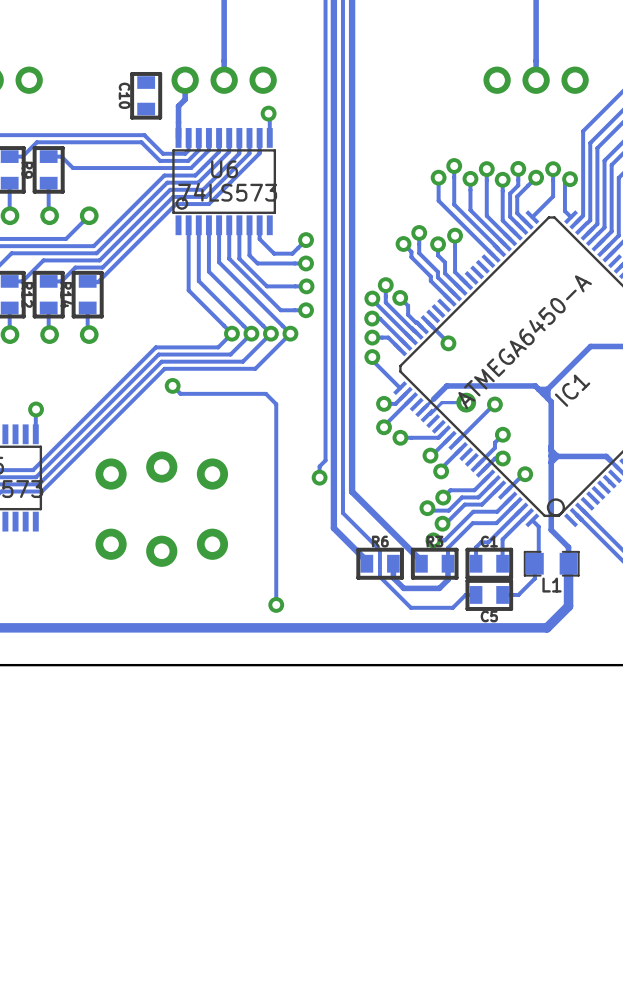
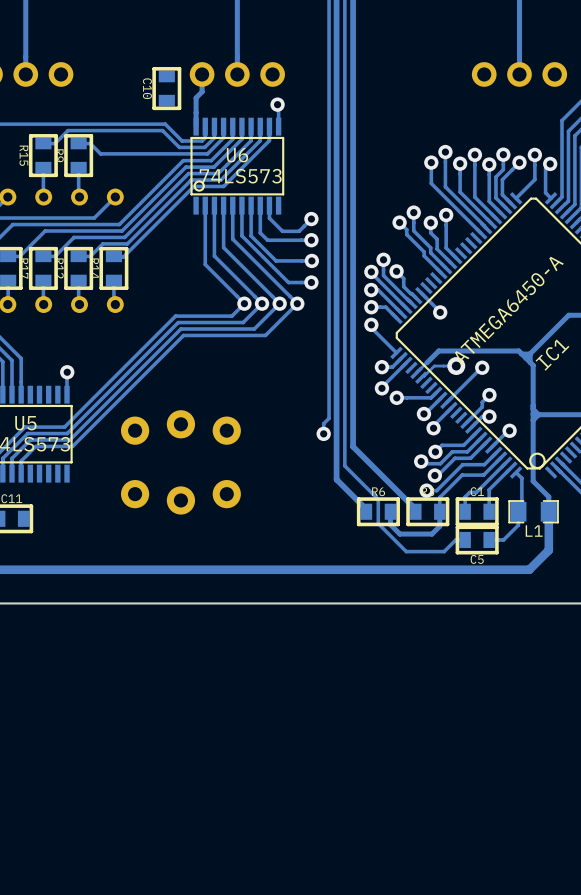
track: (172, 385) (180, 393) (265, 393) (276, 404) (276, 604) -> none
via: (172, 385) -> none
via: (276, 604) -> none

